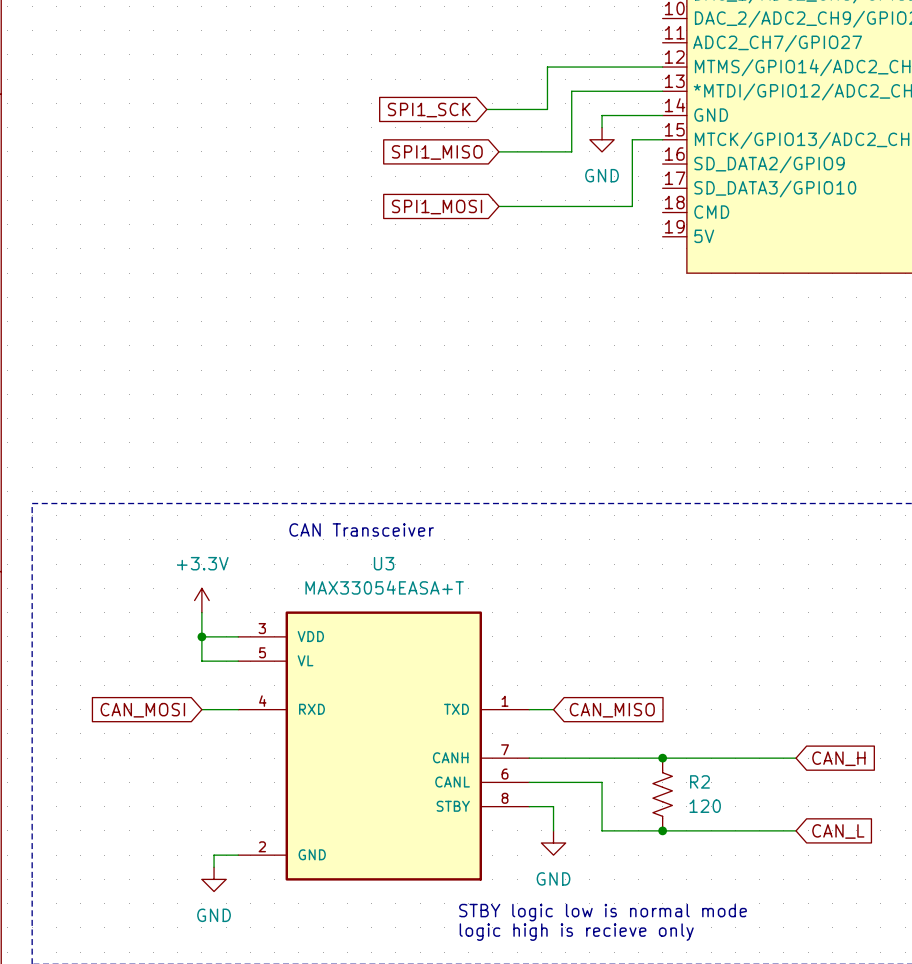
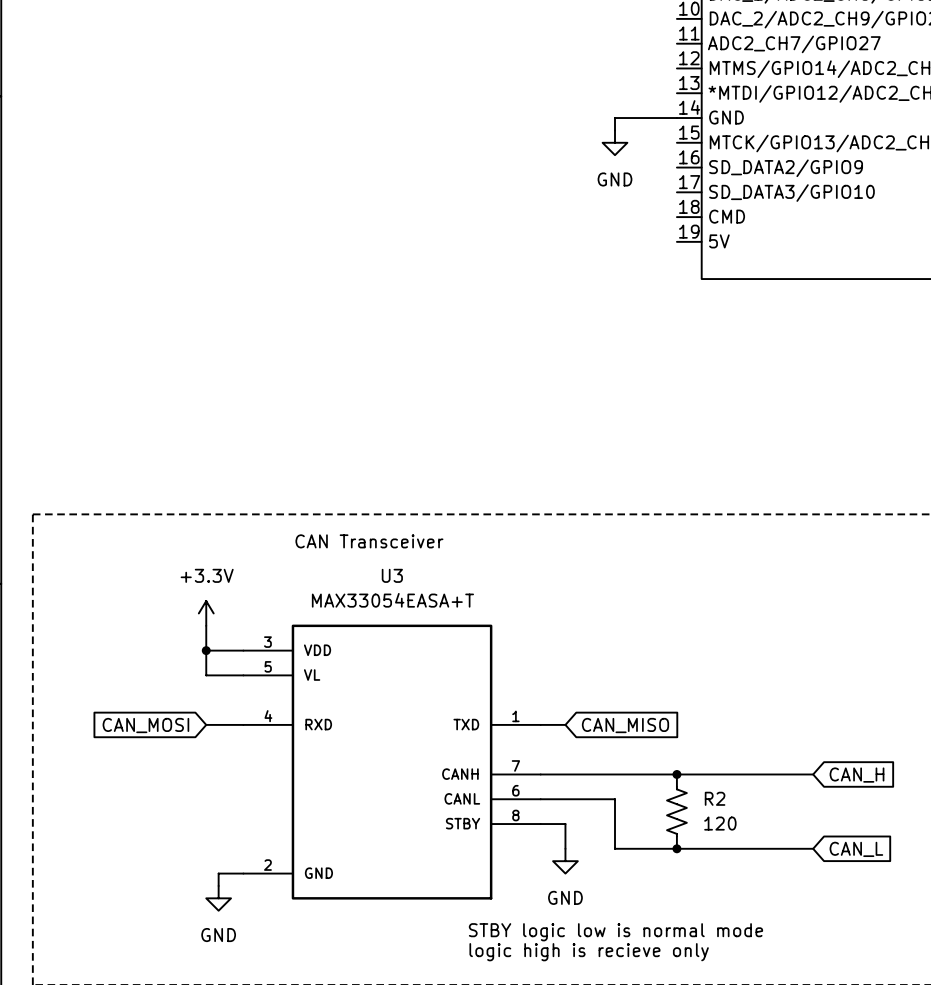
wire: (662, 67) (547, 67) (547, 109) (486, 109) -> none
wire: (662, 91) (571, 91) (571, 151) (498, 151) -> none
global label: SPI1_SCK (429, 110) -> none
wire: (662, 139) (632, 139) (632, 206) (498, 206) -> none
global label: SPI1_MISO (437, 152) -> none
global label: SPI1_MOSI (437, 207) -> none

